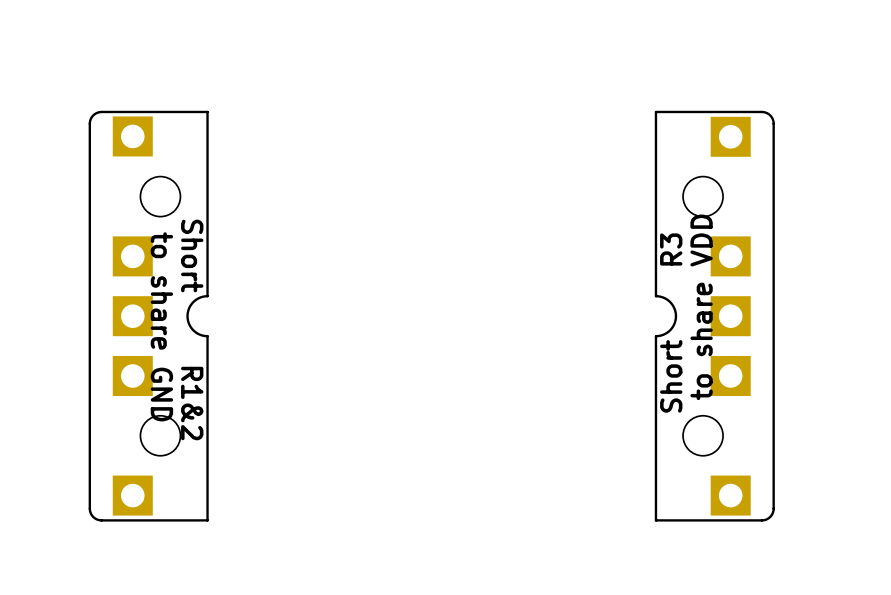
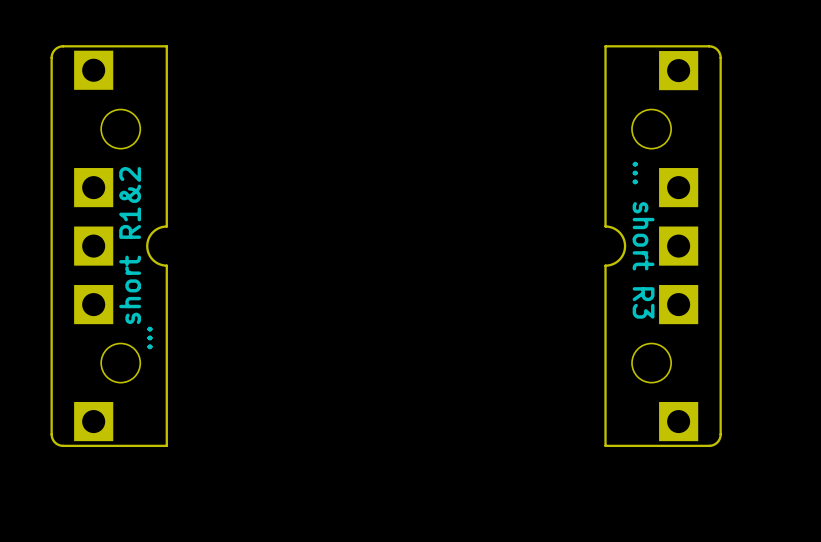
text: to share VDD (701, 307) -> none
text: none -> ... short R3 (643, 240)
text: Short R3 (671, 323) -> none
text: to share GND (161, 326) -> none
text: Short R1&2 (192, 329) -> short R1&2 (130, 245)
text: none -> ... (149, 337)

